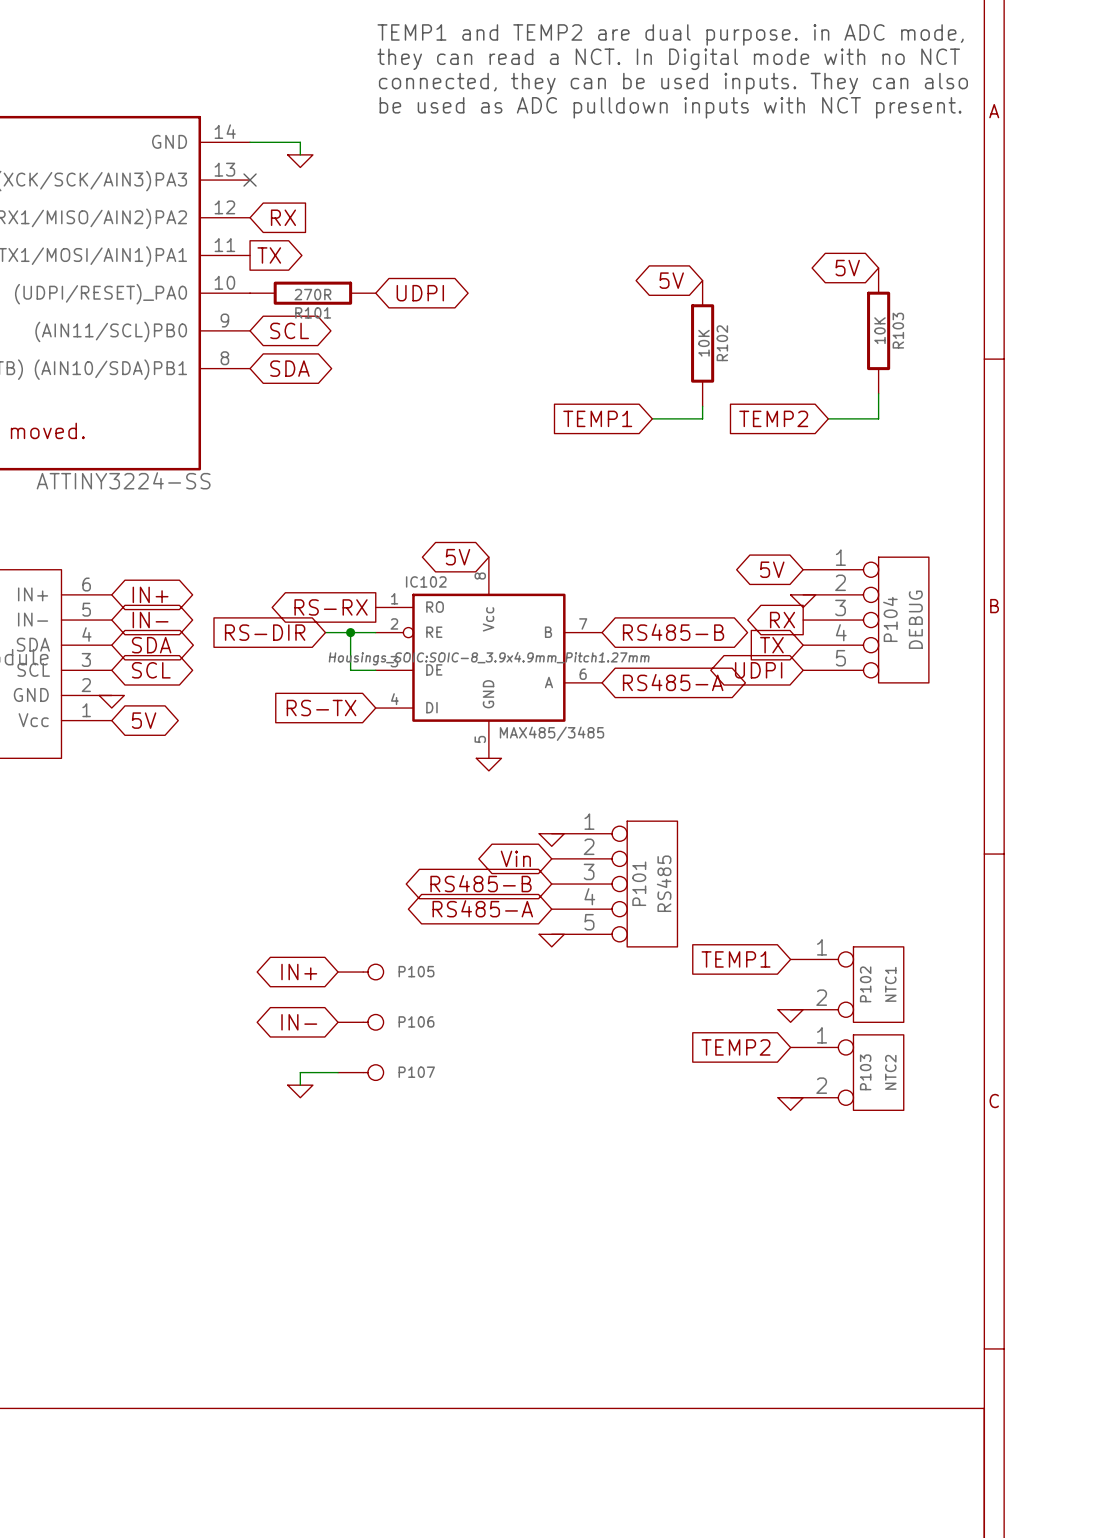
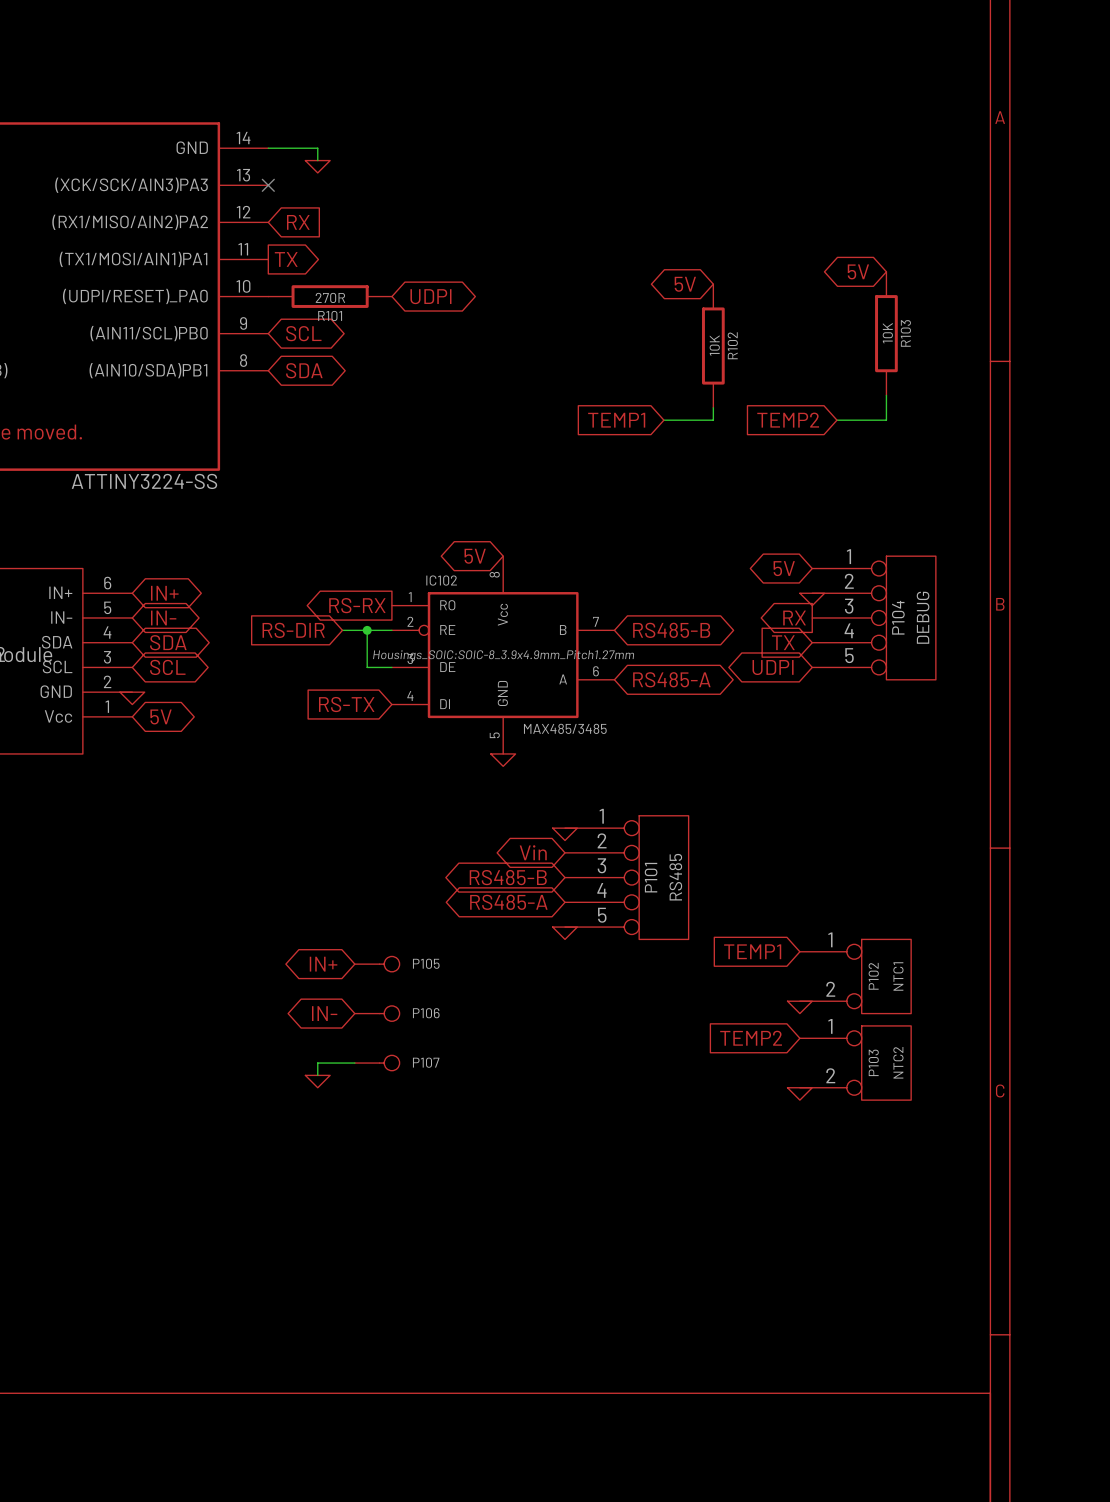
text: TEMP1 and TEMP2 are dual purpose. in ADC mode, (670, 34) -> none
text: they can read a NCT. In Digital mode with no NCT (668, 59) -> none
text: connected, they can be used inputs. They can also (673, 83) -> none
text: be used as ADC pulldown inputs with NCT present. (670, 107) -> none

